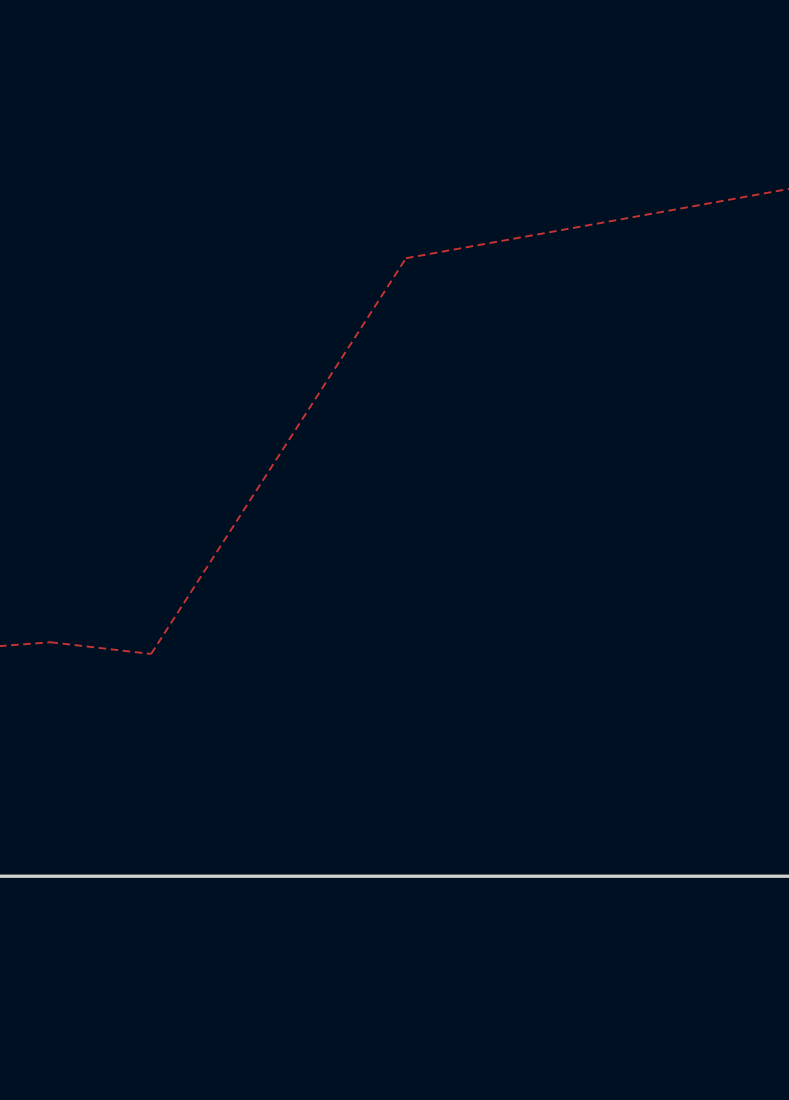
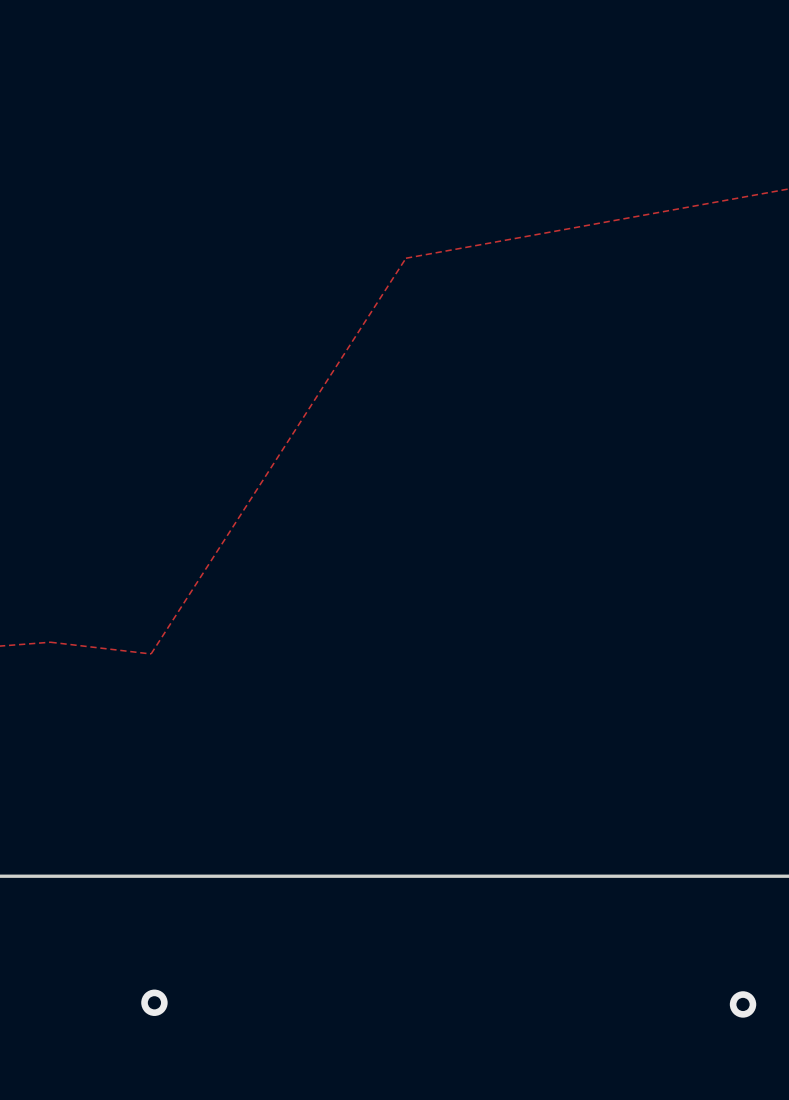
via: none -> (154, 1002)
via: none -> (743, 1004)

